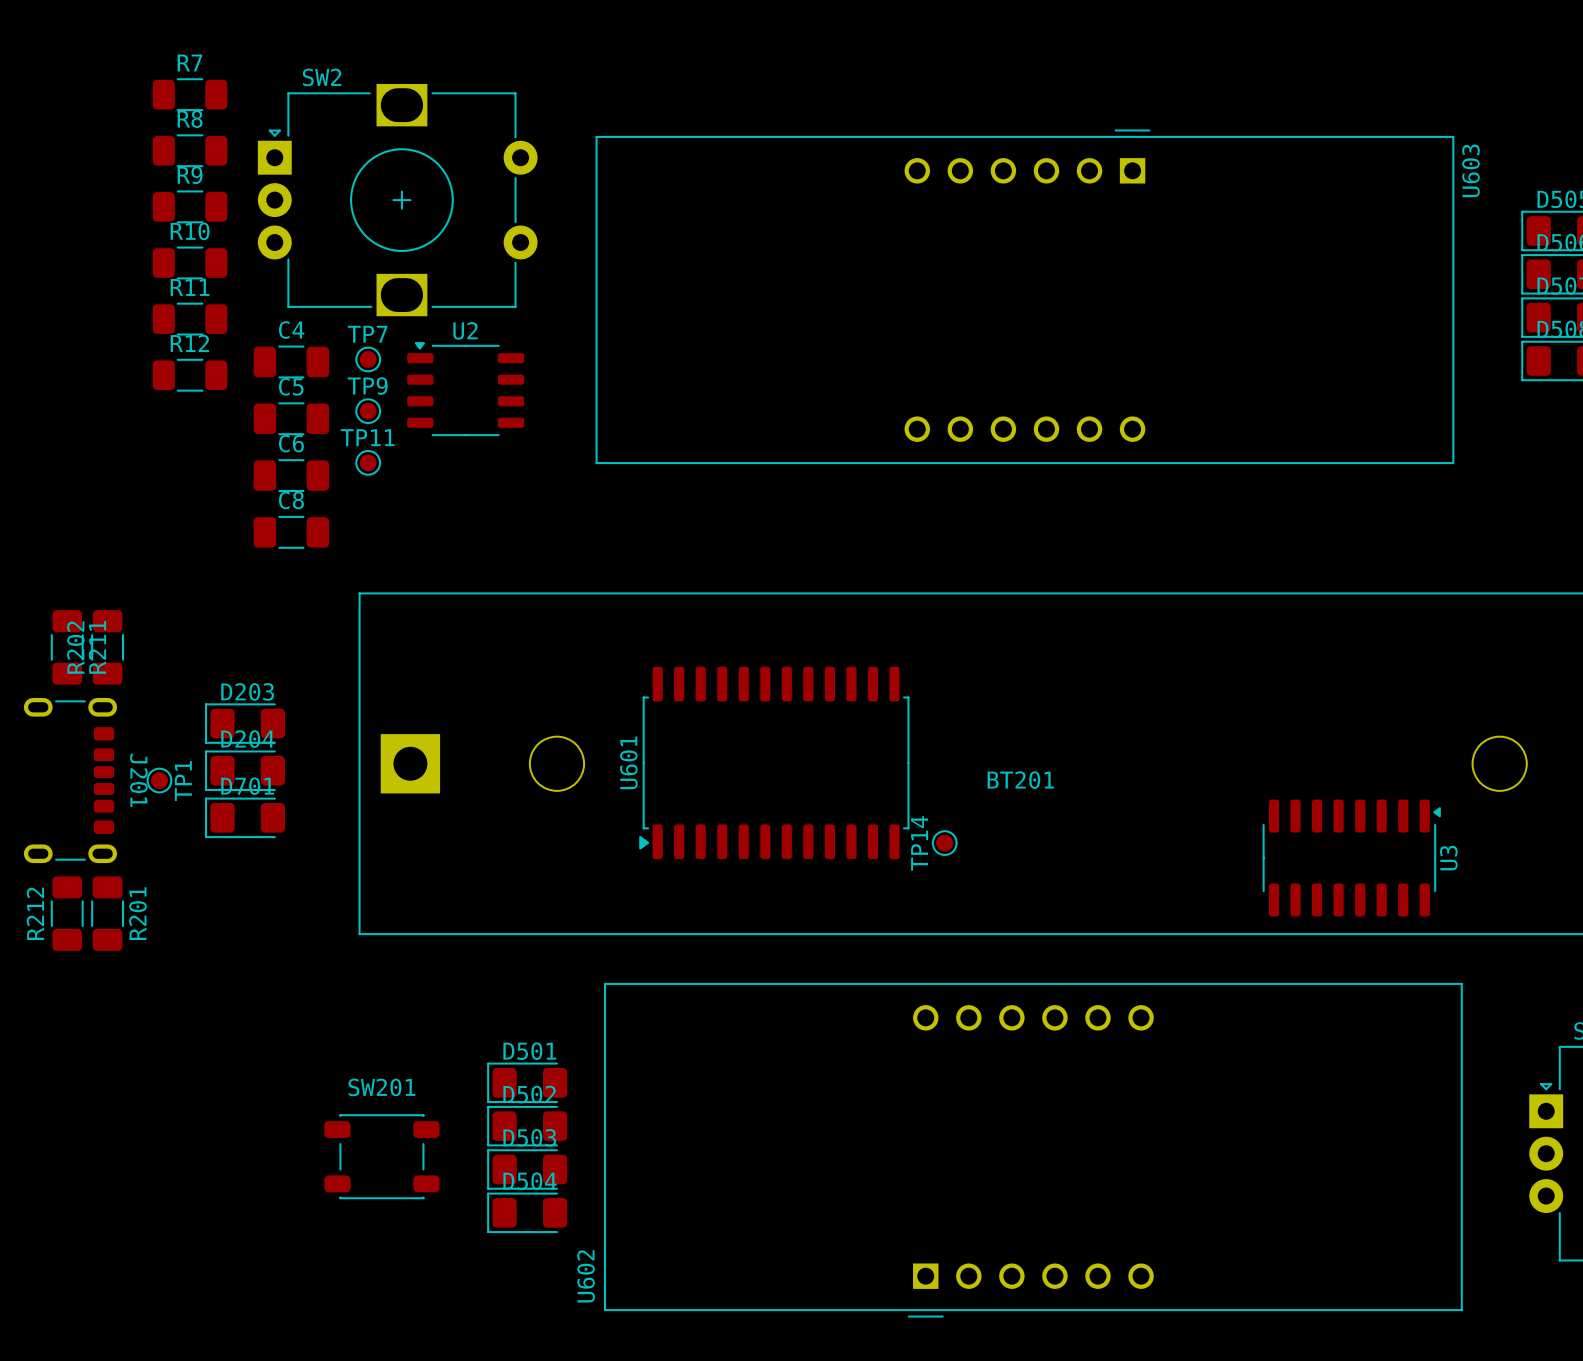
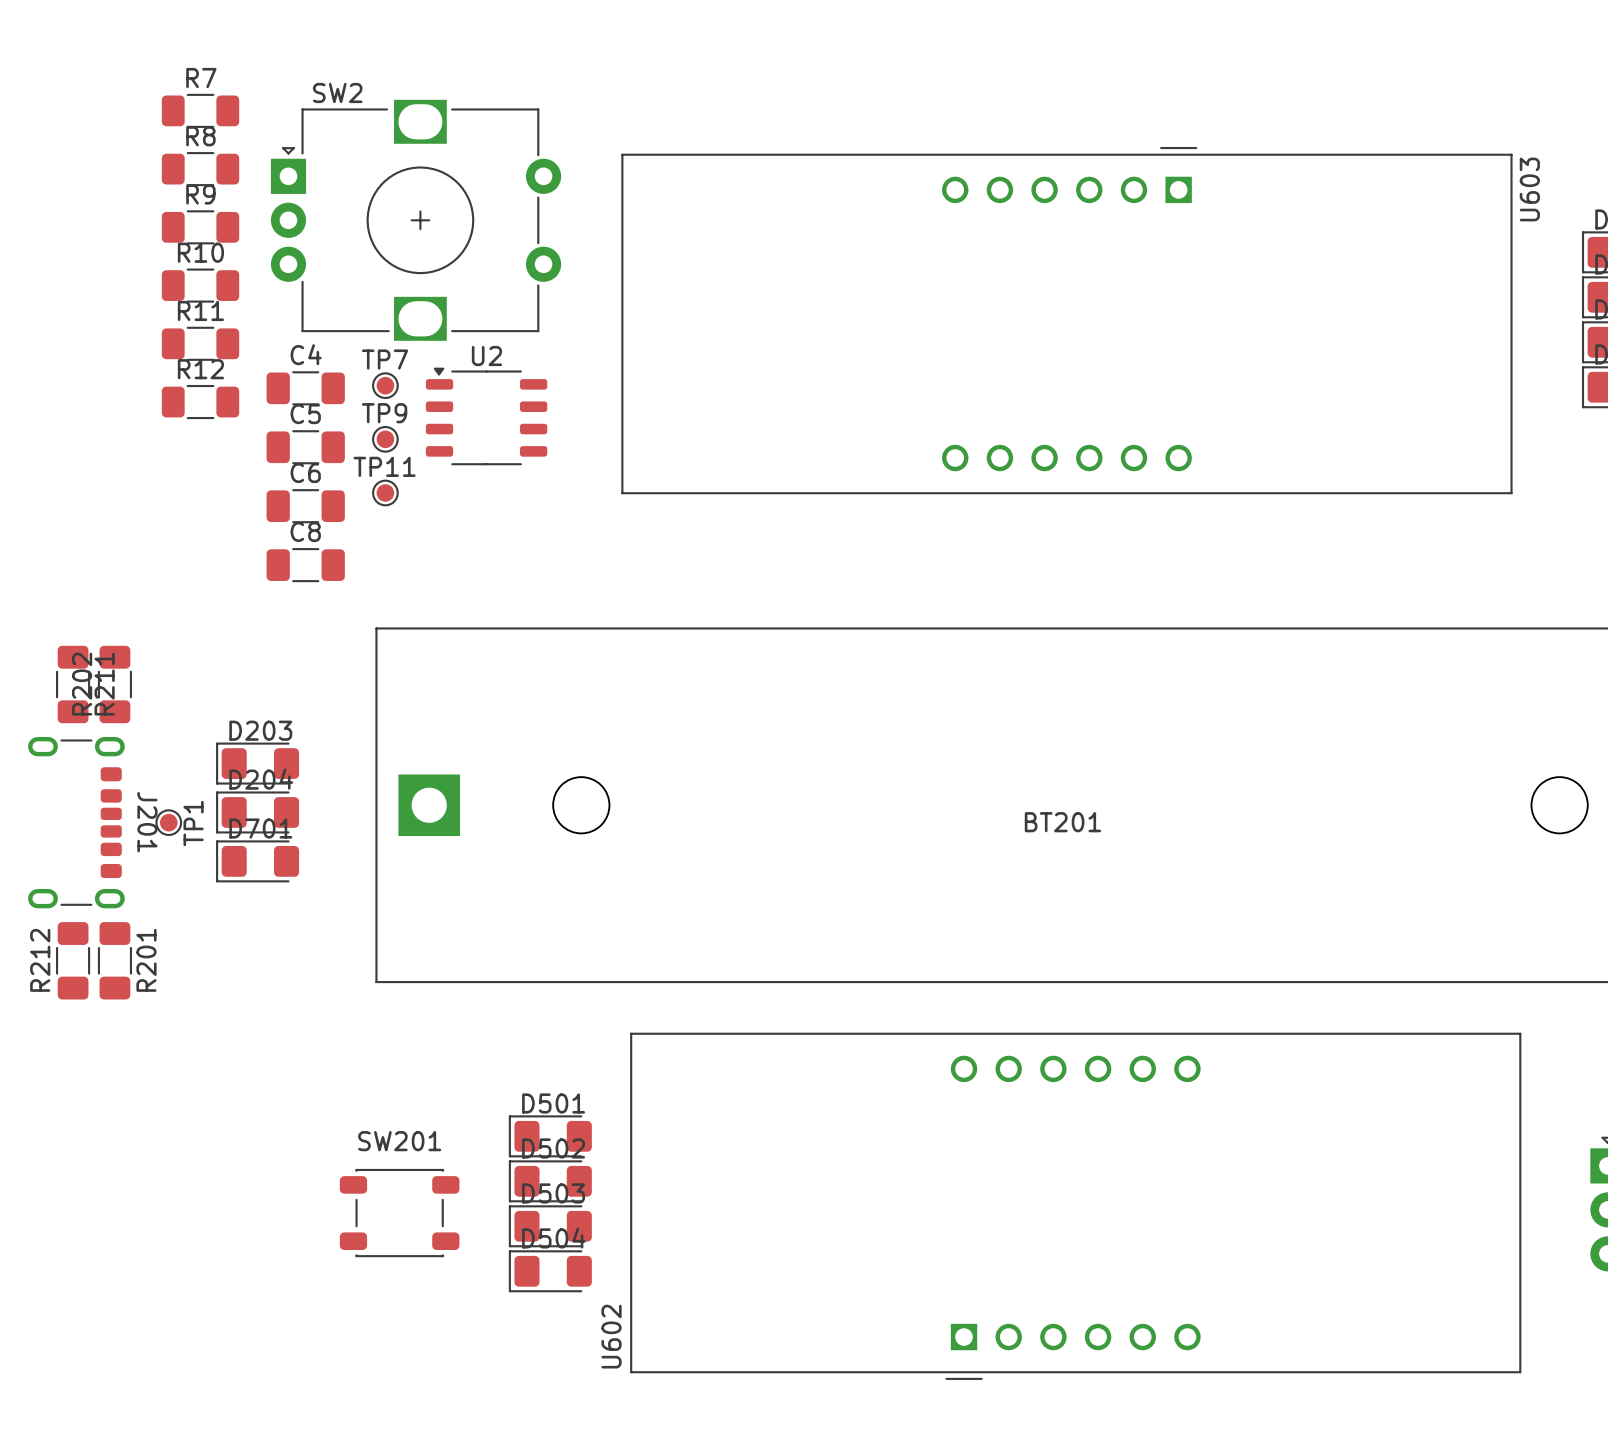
U601: (774, 762) -> none
TP14: (944, 843) -> none
U3: (1351, 858) -> none

